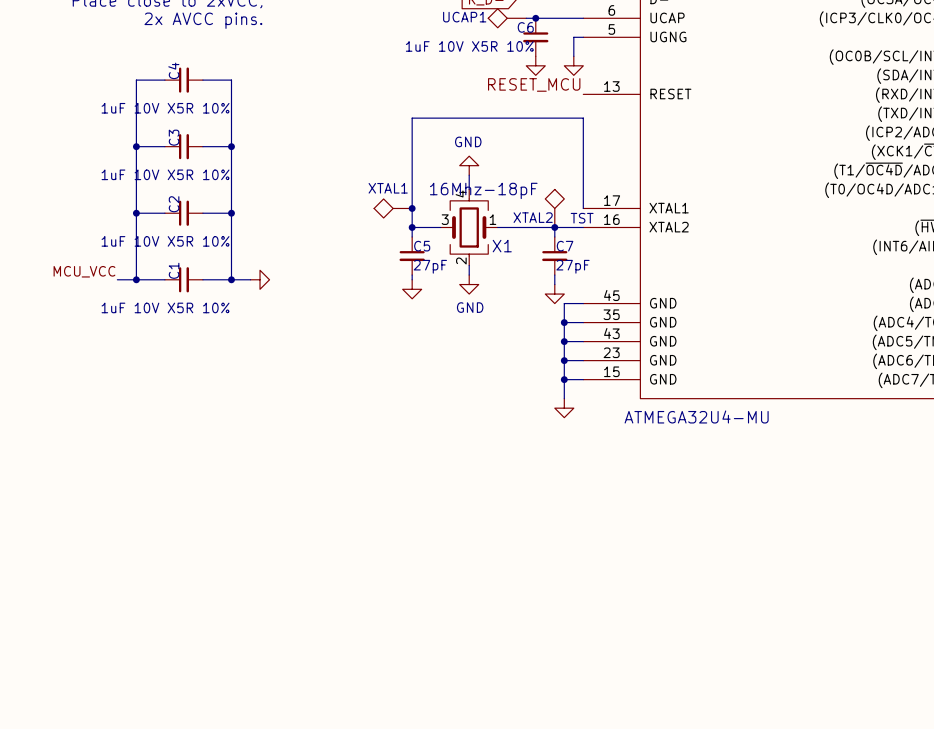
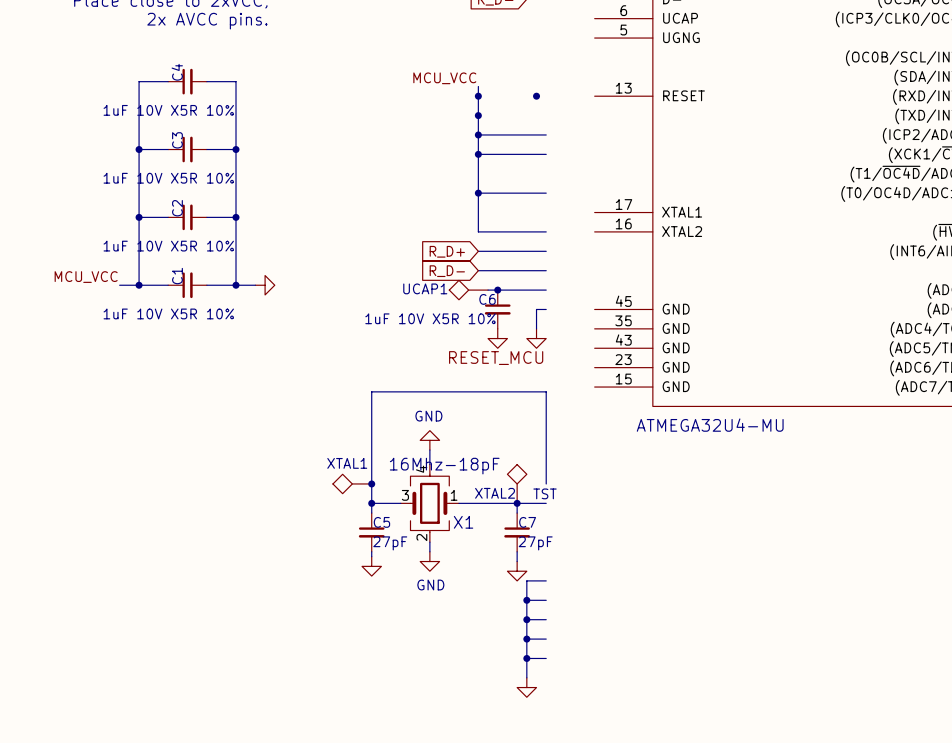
UCAP1 position: (507, 18) -> (468, 290)
wire: (526, 18) (583, 18) -> none
junction: (535, 18) -> none
C6 position: (535, 37) -> (497, 309)
wire: (583, 37) (573, 37) (573, 56) -> none
power symbol: (535, 65) -> none
power symbol: (573, 65) -> none
label: none -> MCU_VCC (444, 78)
wire: none -> (478, 86) (478, 178)
label: RESET_MCU (534, 84) -> none
junction: none -> (478, 96)
junction: none -> (536, 96)
junction: none -> (478, 115)
wire: none -> (478, 134) (546, 134)
junction: none -> (478, 134)
wire: none -> (478, 154) (546, 154)
junction: none -> (478, 154)
power symbol: GND (469, 165) -> none
junction: none -> (478, 193)
wire: none -> (546, 193) (478, 193) (478, 231) (507, 231)
XTAL1 position: (393, 208) -> (352, 483)
junction: (412, 208) -> none
XTAL2 position: (554, 208) -> (517, 483)
wire: (583, 208) (583, 118) (412, 118) (412, 236) -> none
wire: (412, 227) (440, 227) -> none
junction: (412, 227) -> none
X1 position: (469, 227) -> (429, 503)
wire: (535, 227) (583, 227) -> none
wire: (554, 227) (554, 236) -> none
junction: (554, 227) -> none
global label: none -> R_D+ (447, 251)
wire: none -> (478, 251) (546, 251)
C5 position: (412, 256) -> (371, 532)
C7 position: (554, 256) -> (517, 532)
global label: none -> R_D- (447, 271)
wire: (469, 265) (469, 275) -> (478, 270) (546, 270)
wire: (412, 275) (412, 279) -> none
wire: (554, 275) (554, 284) -> none
power symbol: GND (469, 284) -> none
wire: none -> (488, 290) (546, 290)
junction: none -> (497, 290)
power symbol: (412, 289) -> none
power symbol: (554, 294) -> none
wire: none -> (546, 309) (536, 309) (536, 328)
wire: (583, 303) (564, 303) (564, 398) -> none
wire: (564, 322) (583, 322) -> none
junction: (564, 322) -> none
power symbol: none -> (497, 338)
power symbol: none -> (536, 338)
wire: (564, 341) (583, 341) -> none
junction: (564, 341) -> none
label: none -> RESET_MCU (496, 358)
wire: (564, 360) (583, 360) -> none
junction: (564, 360) -> none
wire: (564, 379) (583, 379) -> none
junction: (564, 379) -> none
power symbol: (564, 408) -> none
power symbol: none -> GND (429, 440)
wire: none -> (429, 450) (429, 464)
junction: none -> (371, 483)
wire: none -> (546, 483) (546, 391) (371, 391) (371, 513)
wire: none -> (371, 503) (400, 503)
junction: none -> (371, 503)
wire: none -> (458, 503) (546, 503)
wire: none -> (517, 503) (517, 513)
junction: none -> (517, 503)
wire: none -> (429, 542) (429, 551)
wire: none -> (371, 551) (371, 556)
wire: none -> (517, 551) (517, 561)
power symbol: none -> GND (429, 561)
power symbol: none -> (371, 566)
power symbol: none -> (517, 571)
wire: none -> (546, 580) (526, 580) (526, 677)
wire: none -> (526, 600) (546, 600)
junction: none -> (526, 600)
wire: none -> (526, 619) (546, 619)
junction: none -> (526, 619)
wire: none -> (526, 639) (546, 639)
junction: none -> (526, 639)
wire: none -> (526, 658) (546, 658)
junction: none -> (526, 658)
power symbol: none -> (526, 687)

